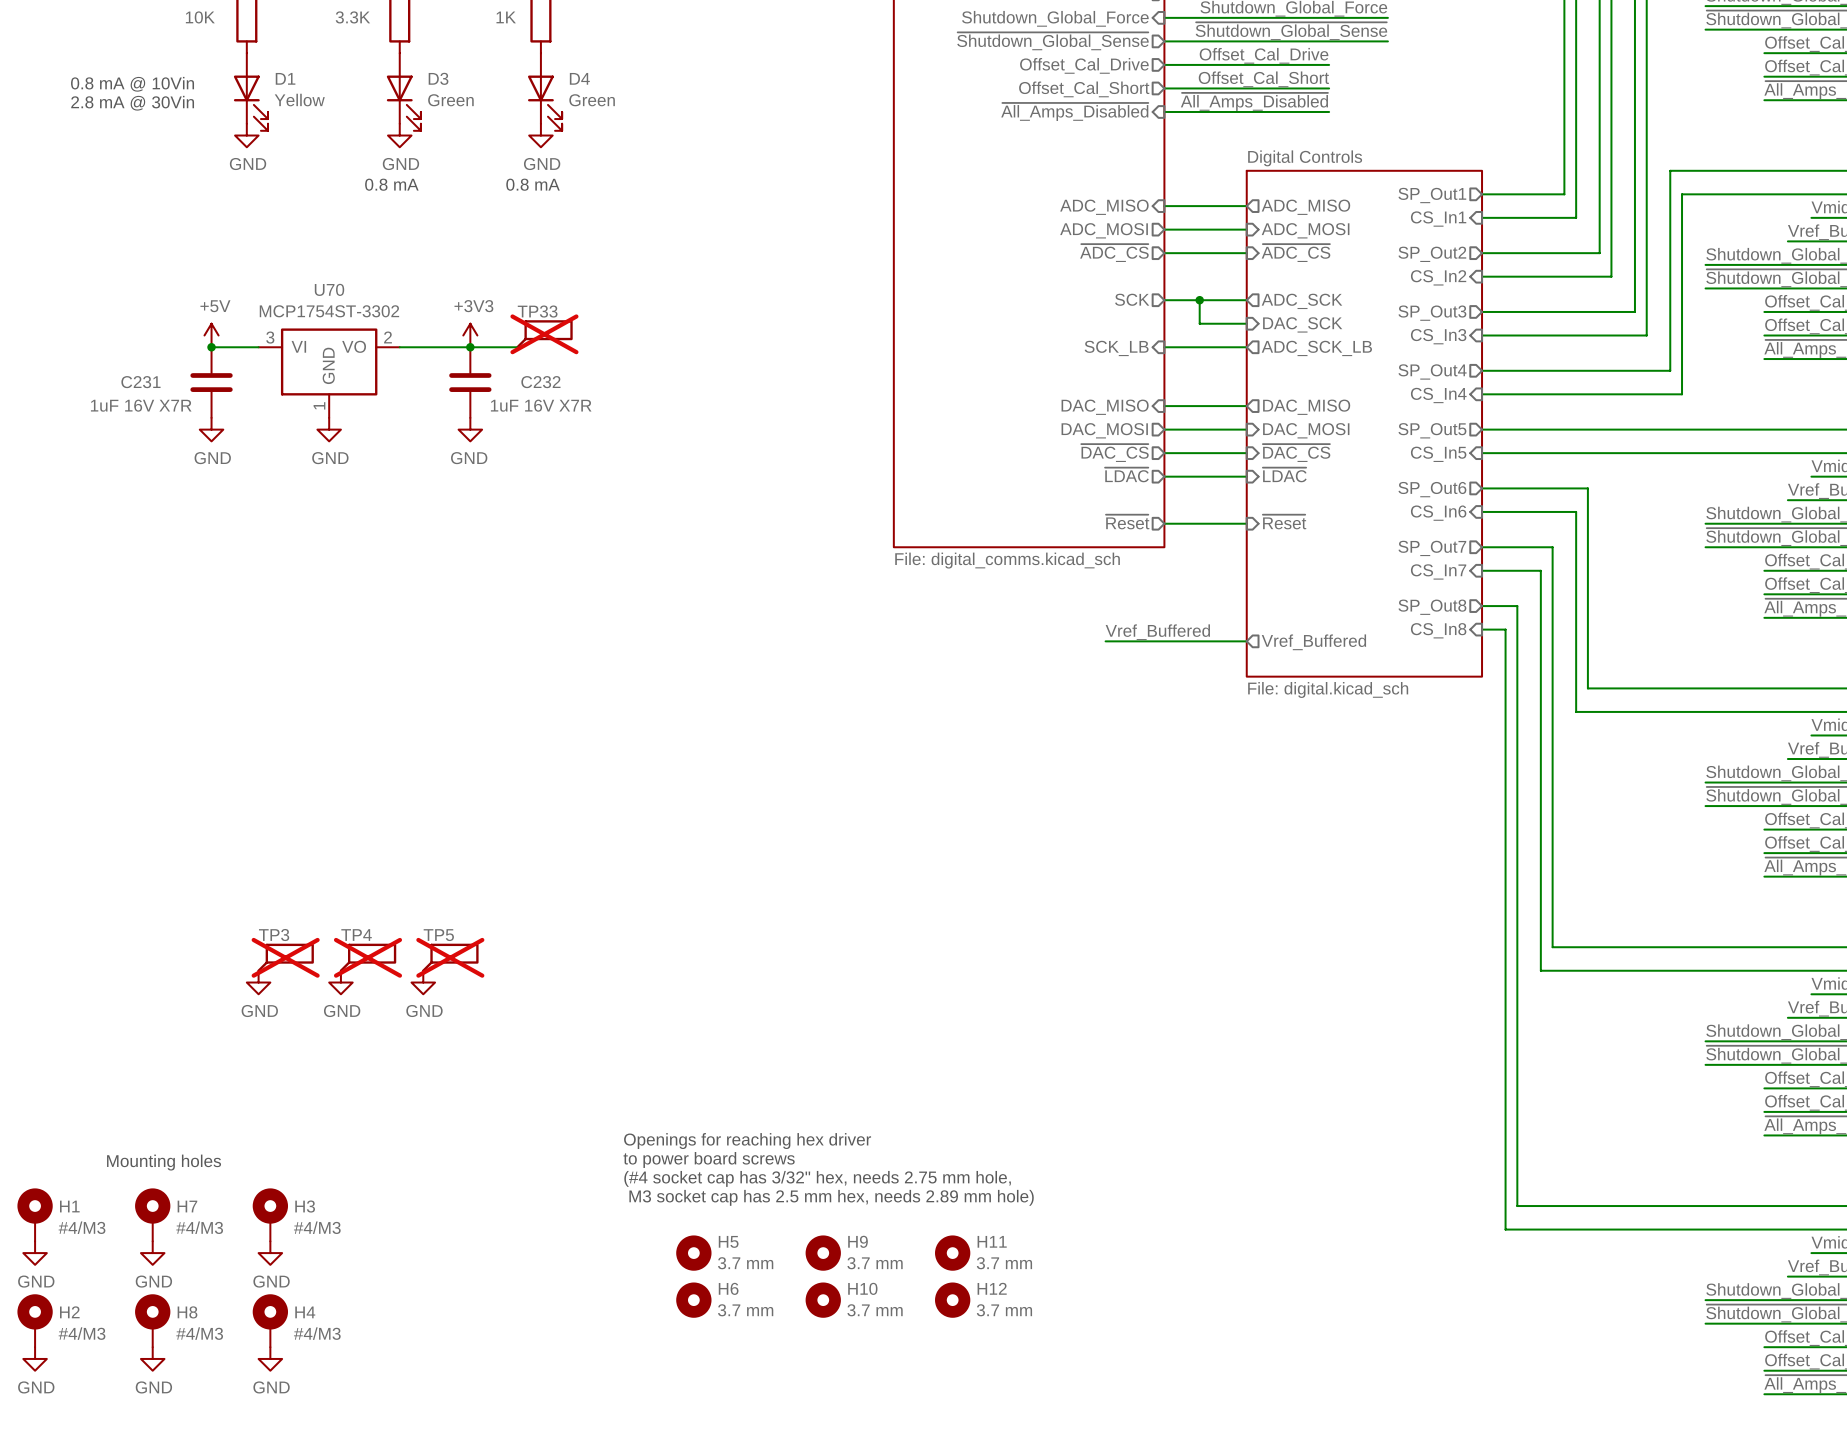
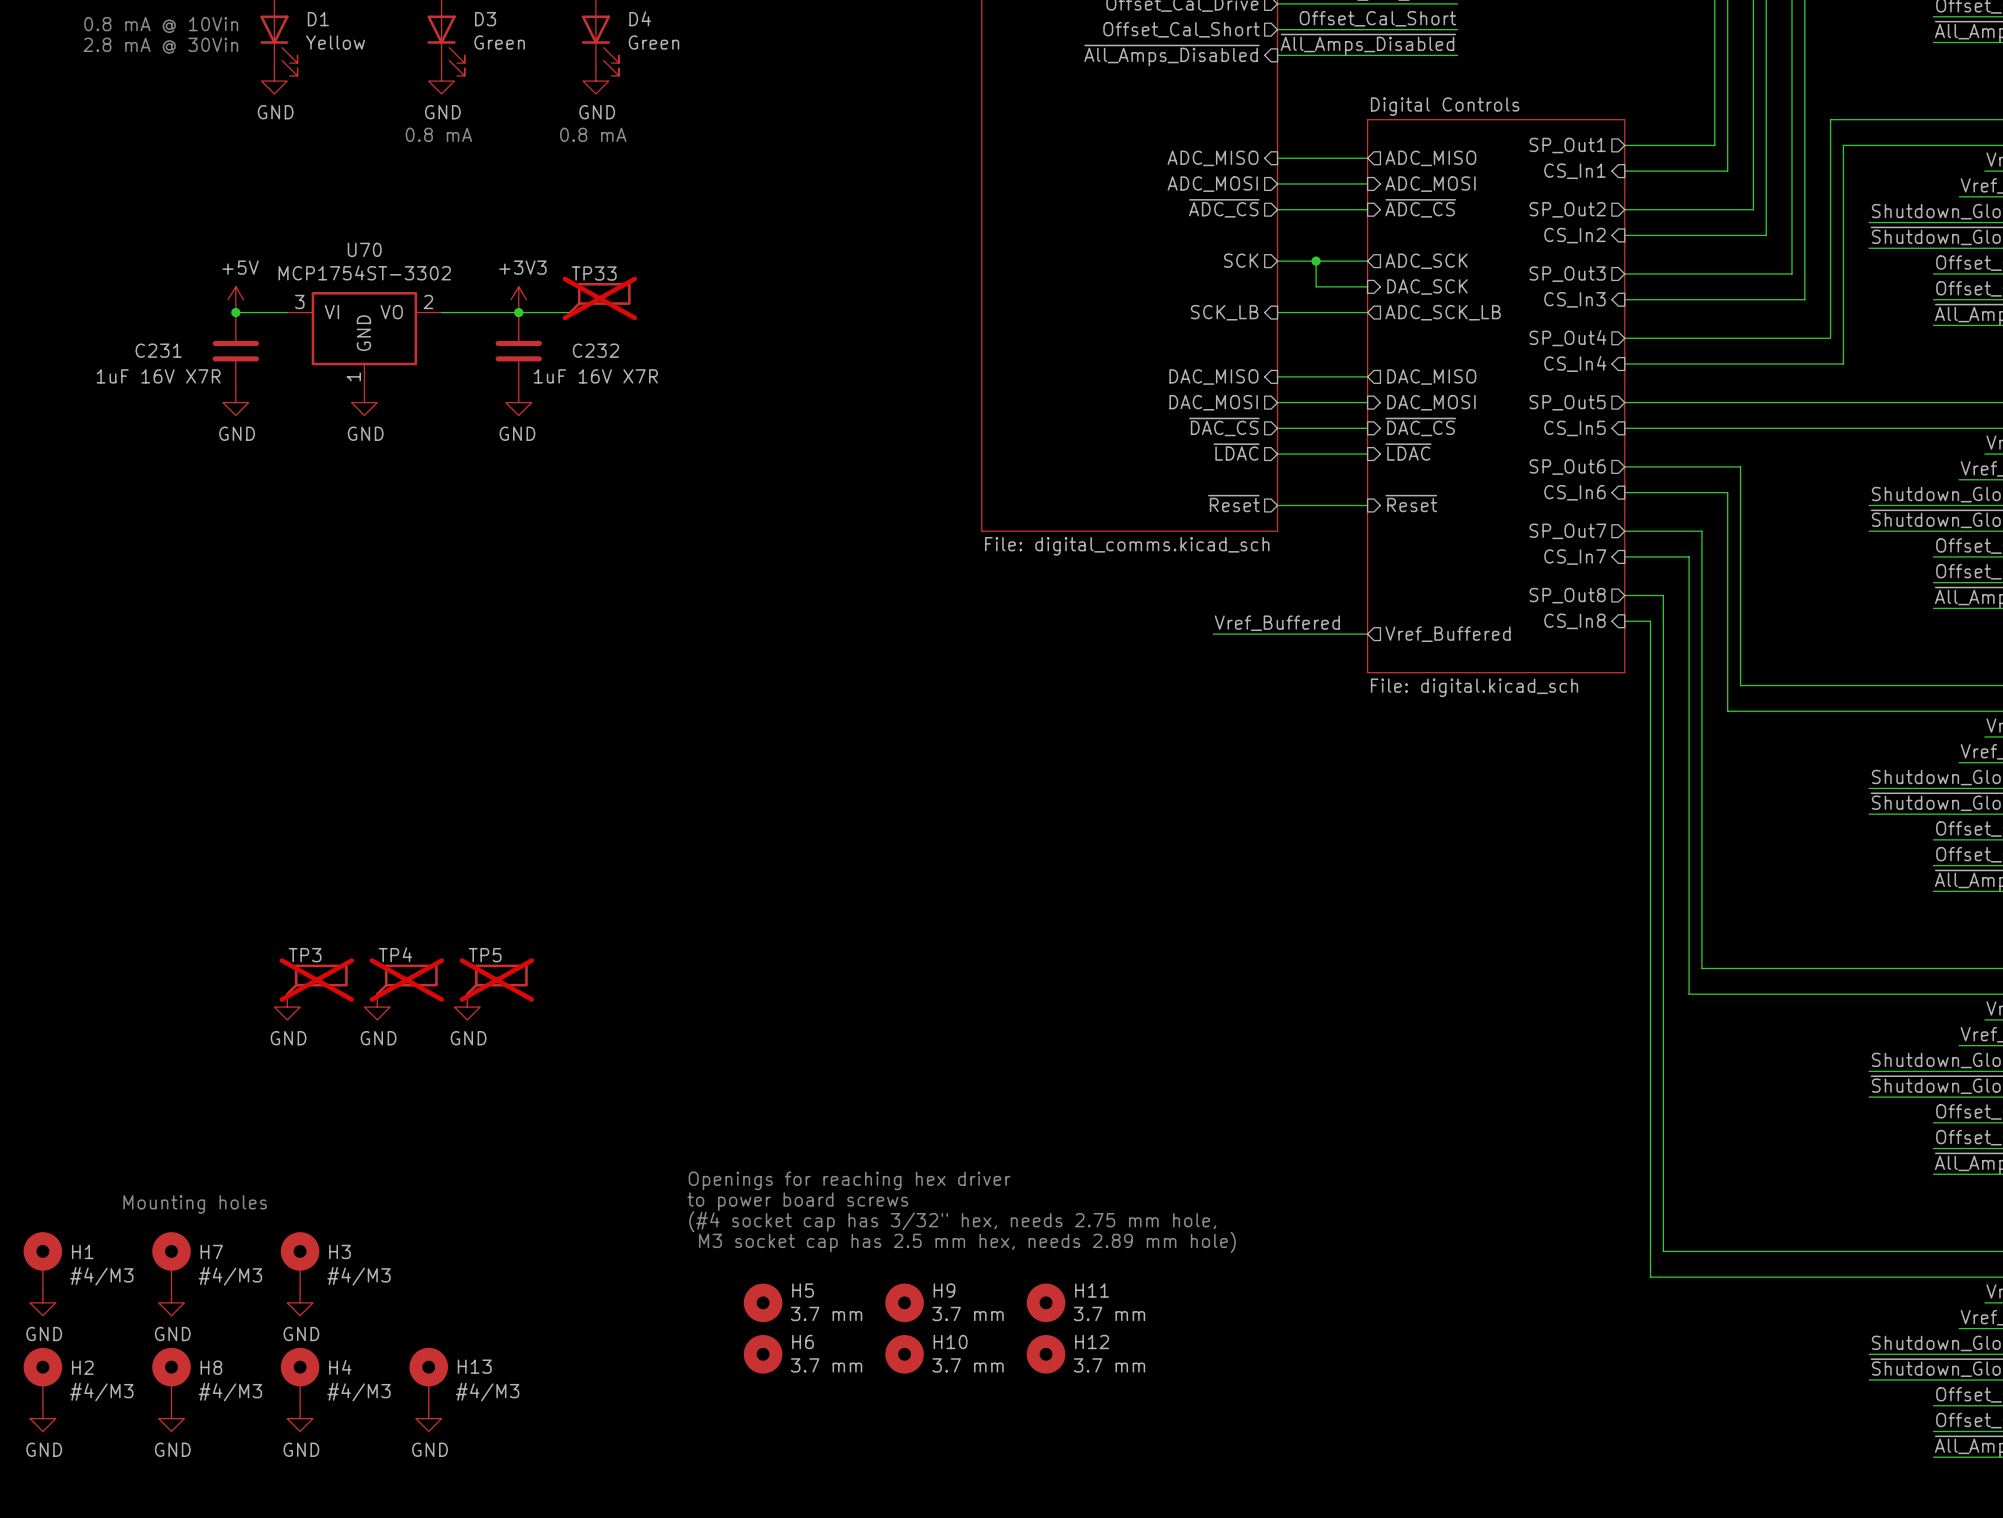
H13: none -> #4/M3 (428, 1376)
power symbol: none -> GND (428, 1418)

